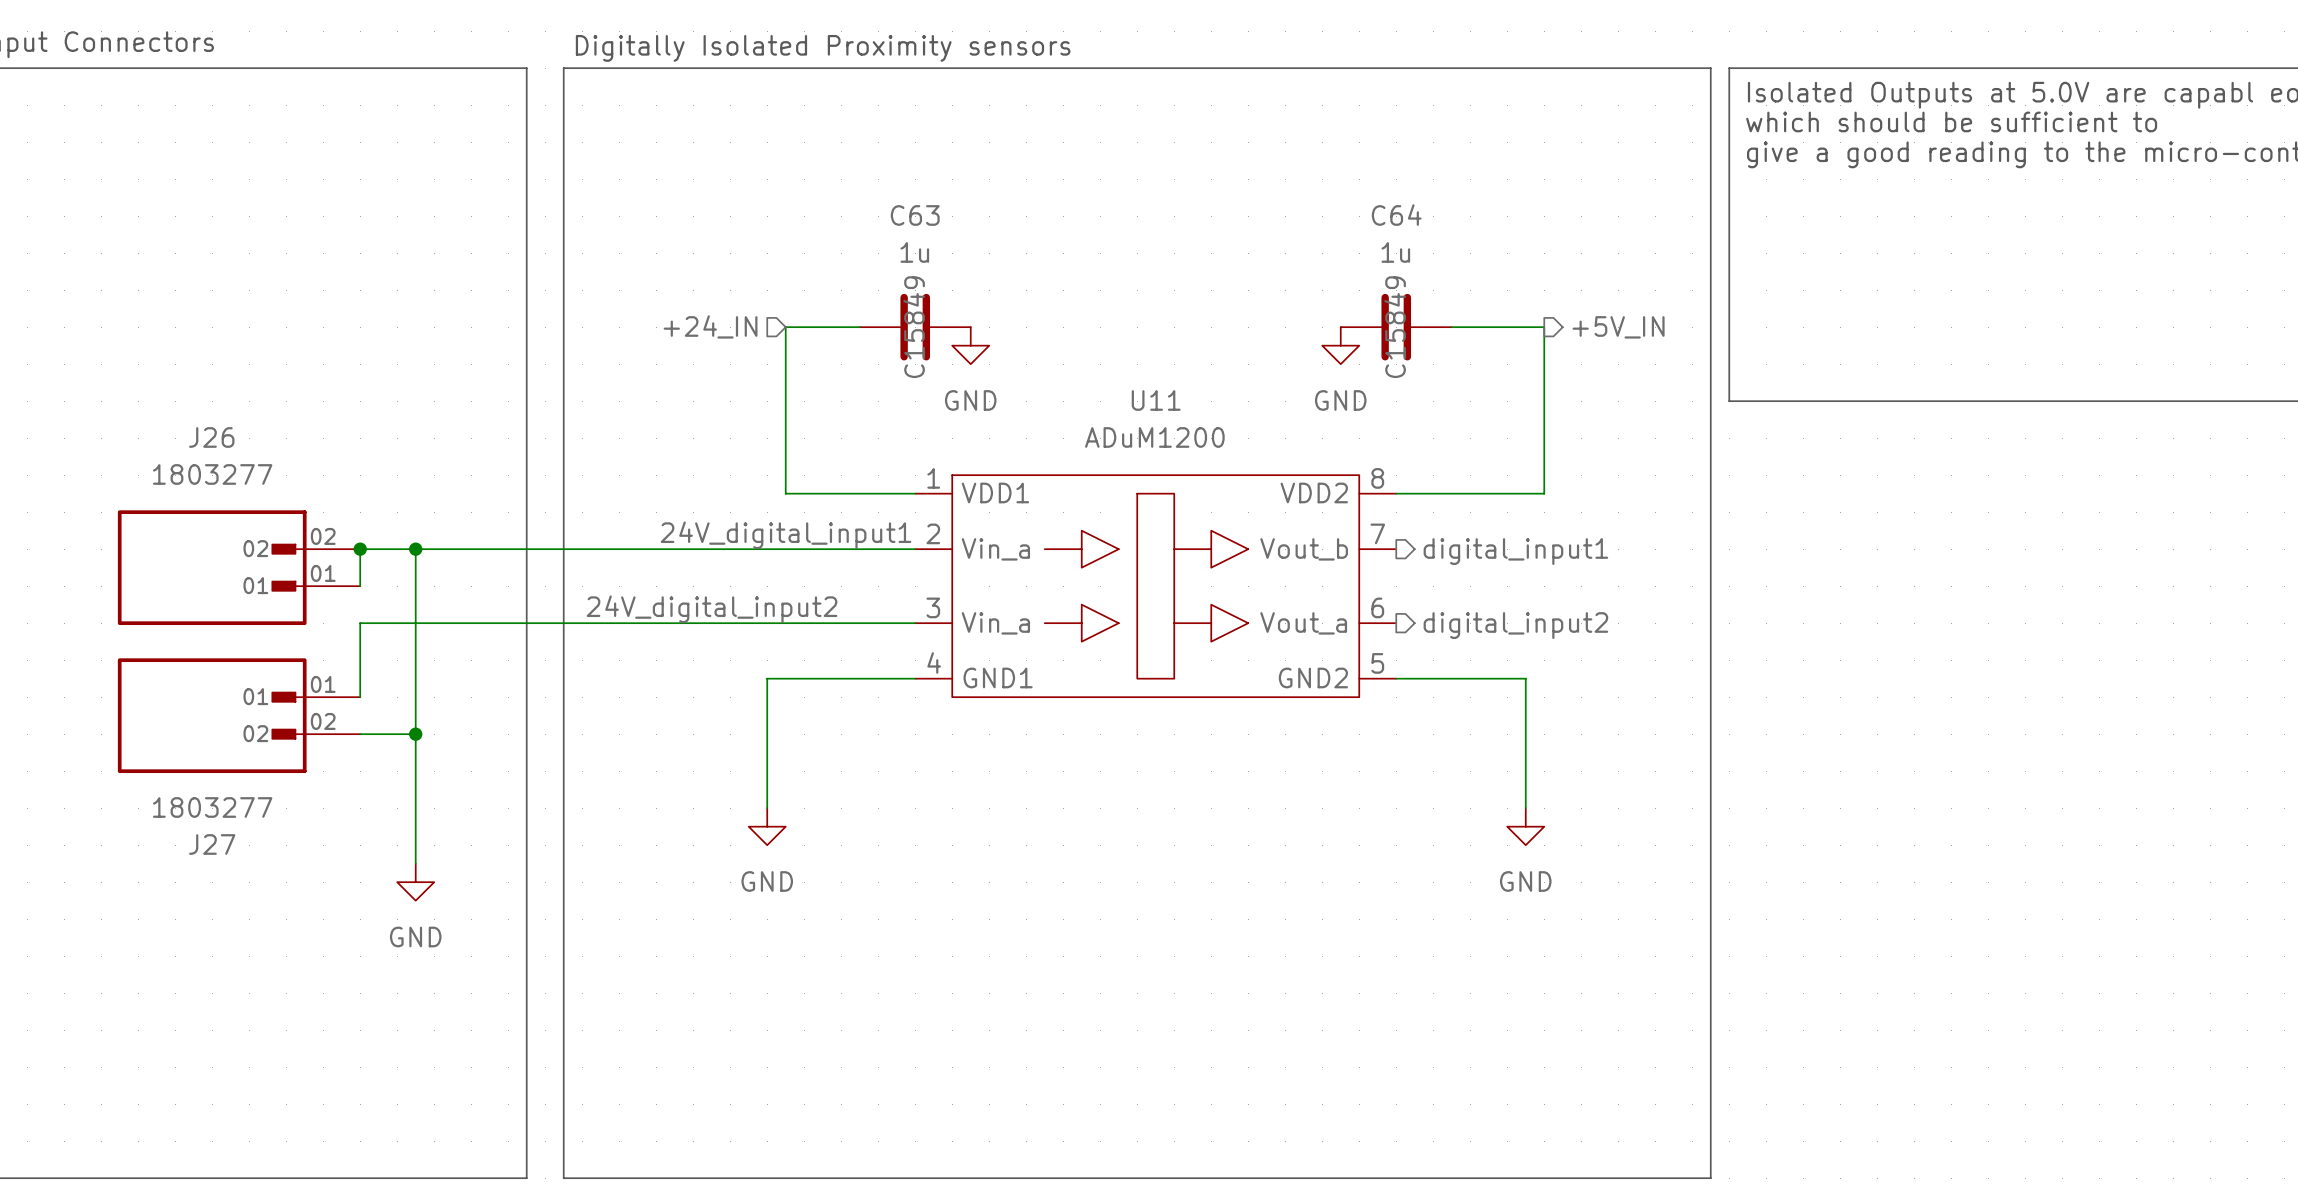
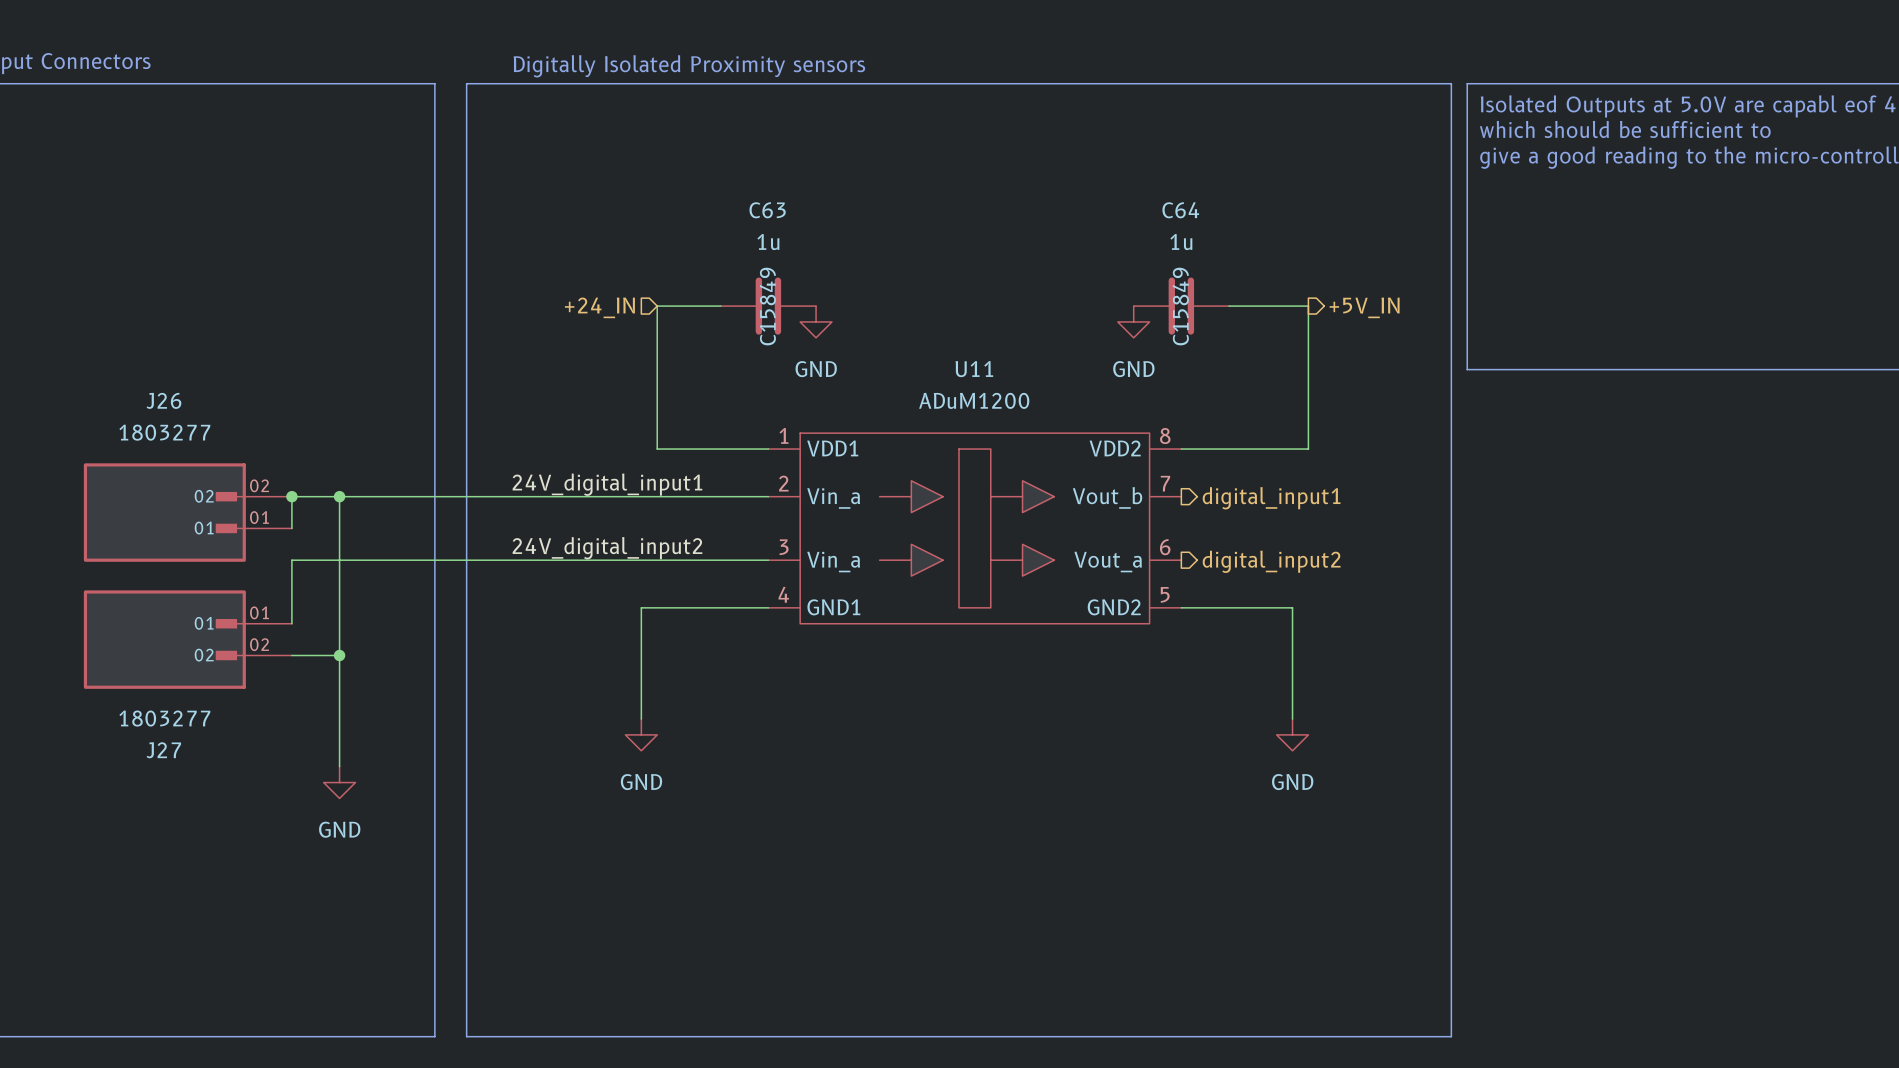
label position: 24V_digital_input1 (786, 535) -> 24V_digital_input1 (607, 484)

